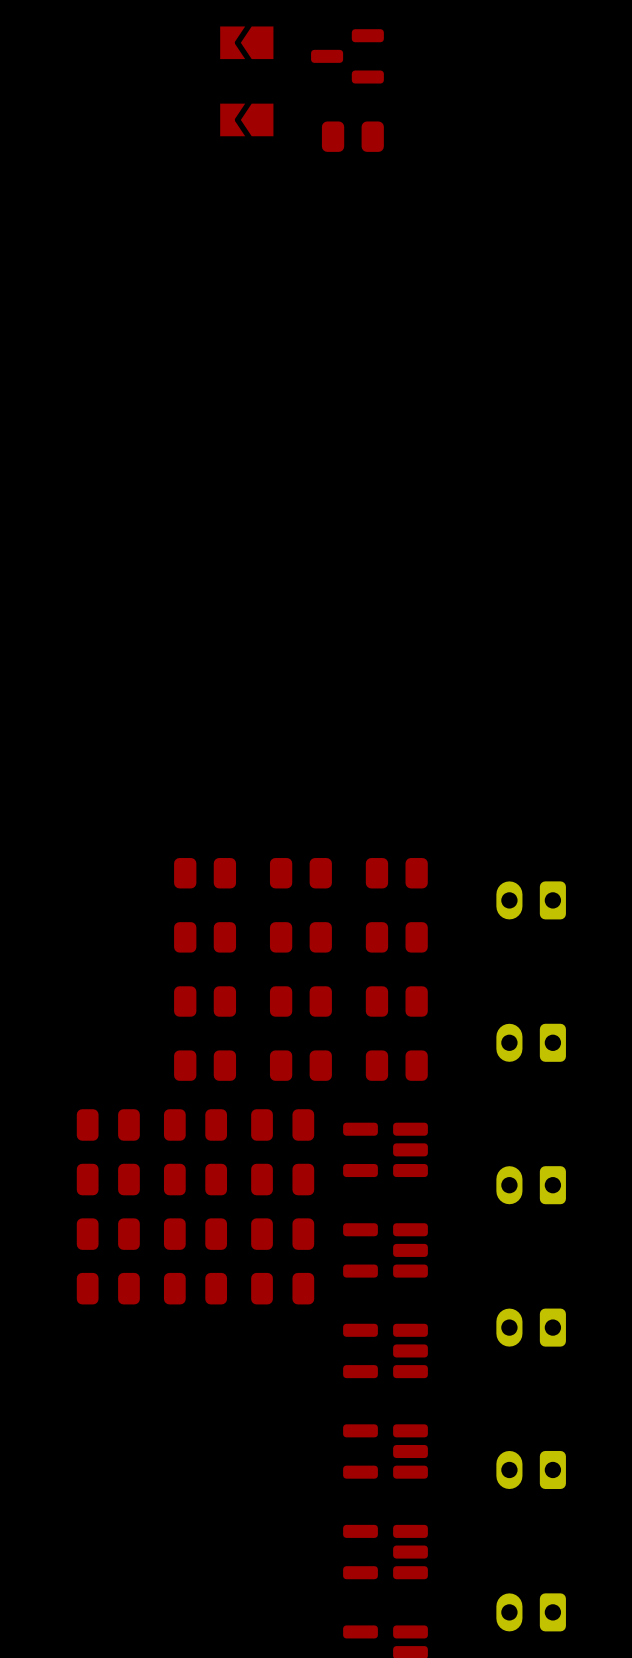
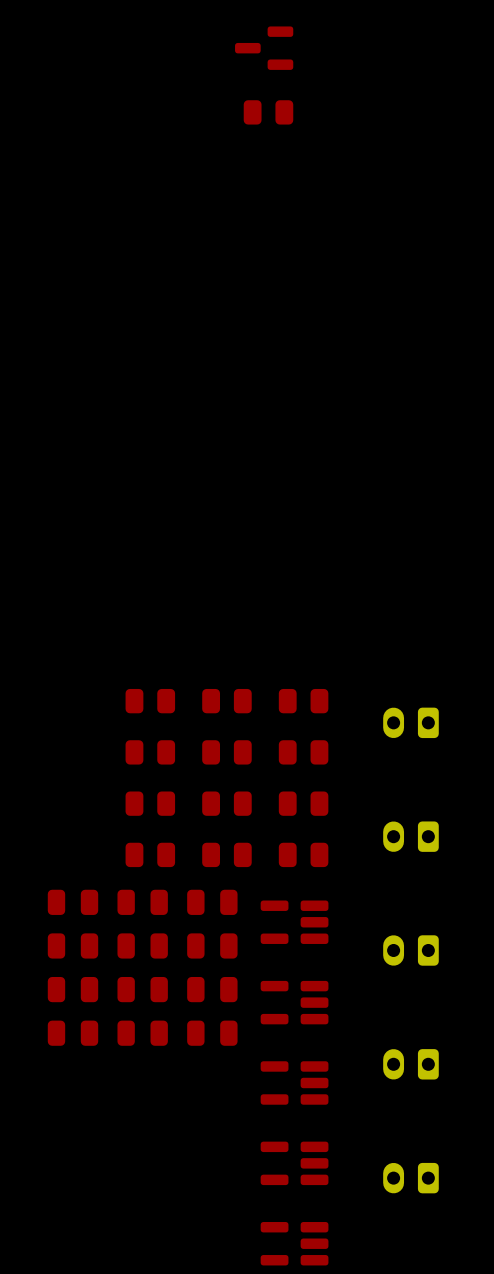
part: (246, 42) -> none
part: (246, 119) -> none

